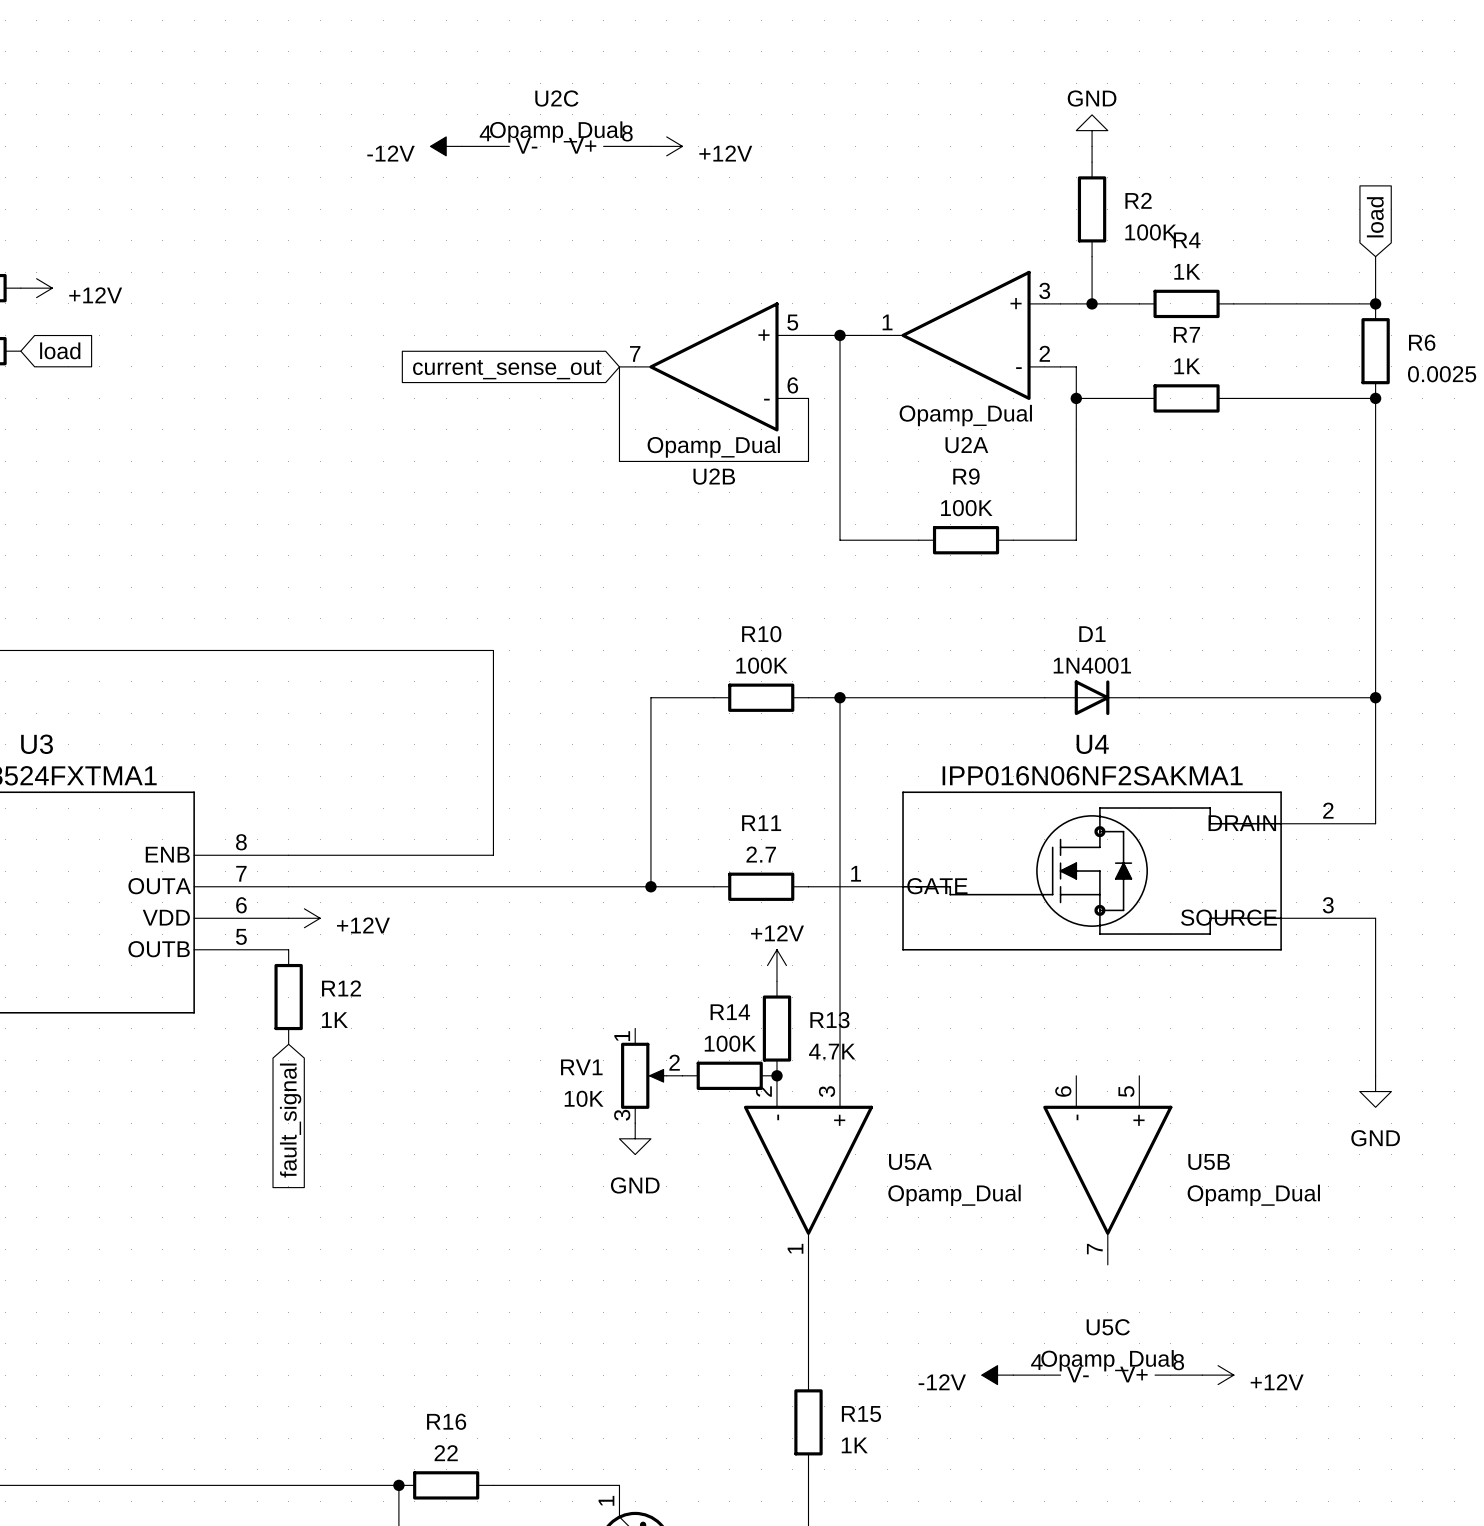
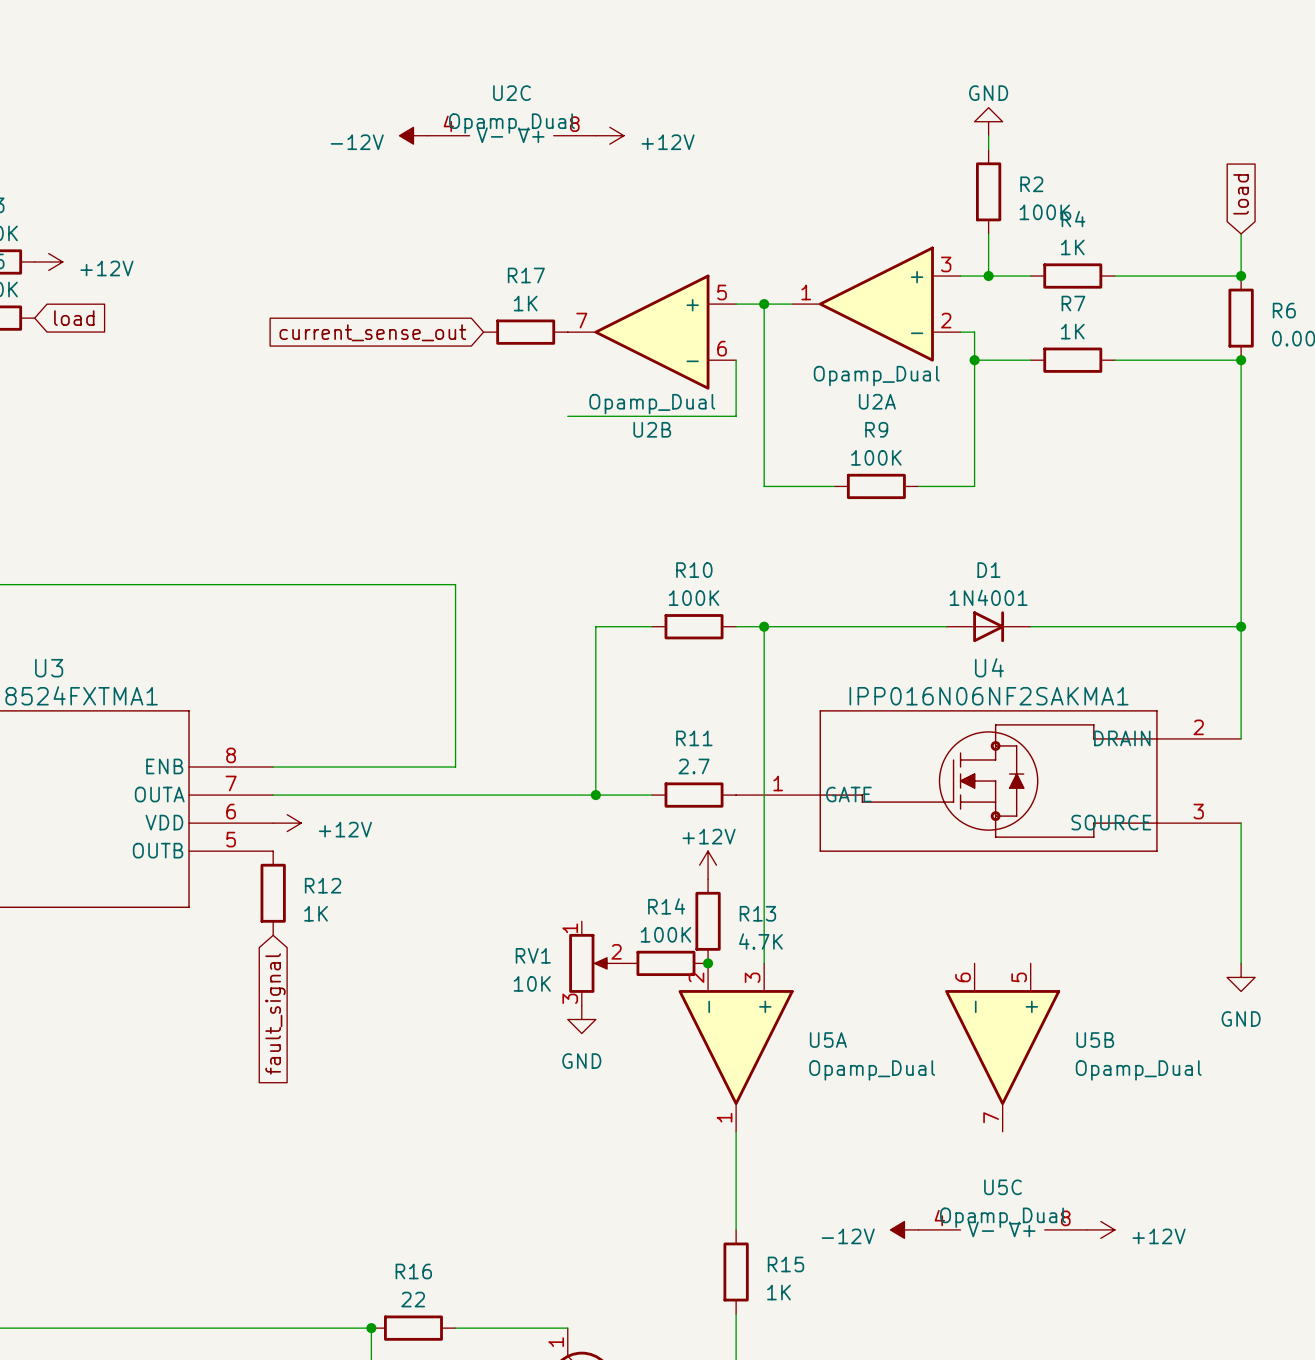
R17: none -> 1K (525, 332)
wire: (619, 366) (619, 461) -> none
global label position: current_sense_out (507, 369) -> current_sense_out (372, 332)

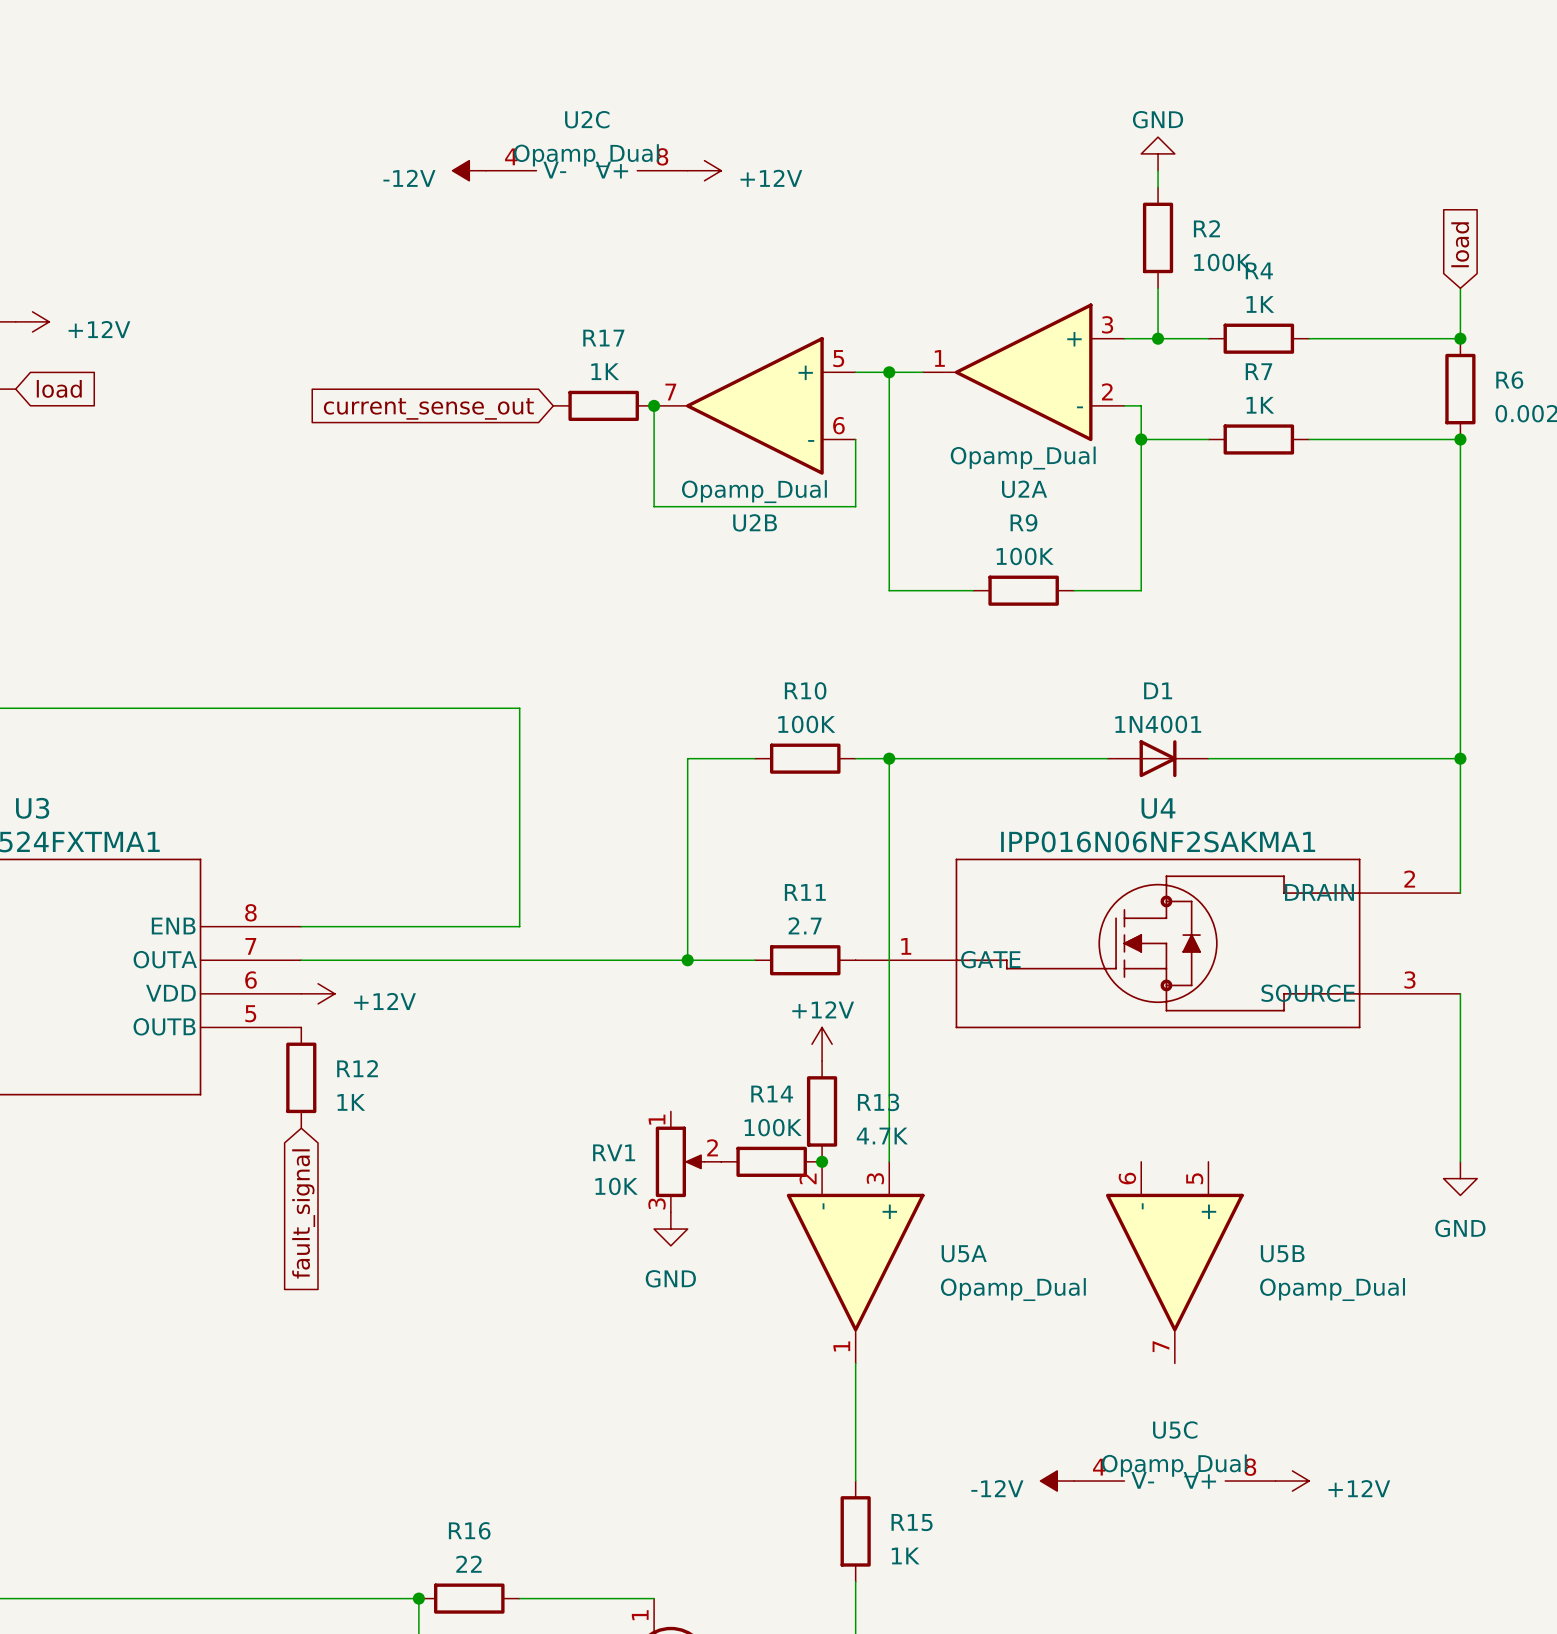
wire: none -> (654, 405) (654, 506)
junction: none -> (654, 405)

